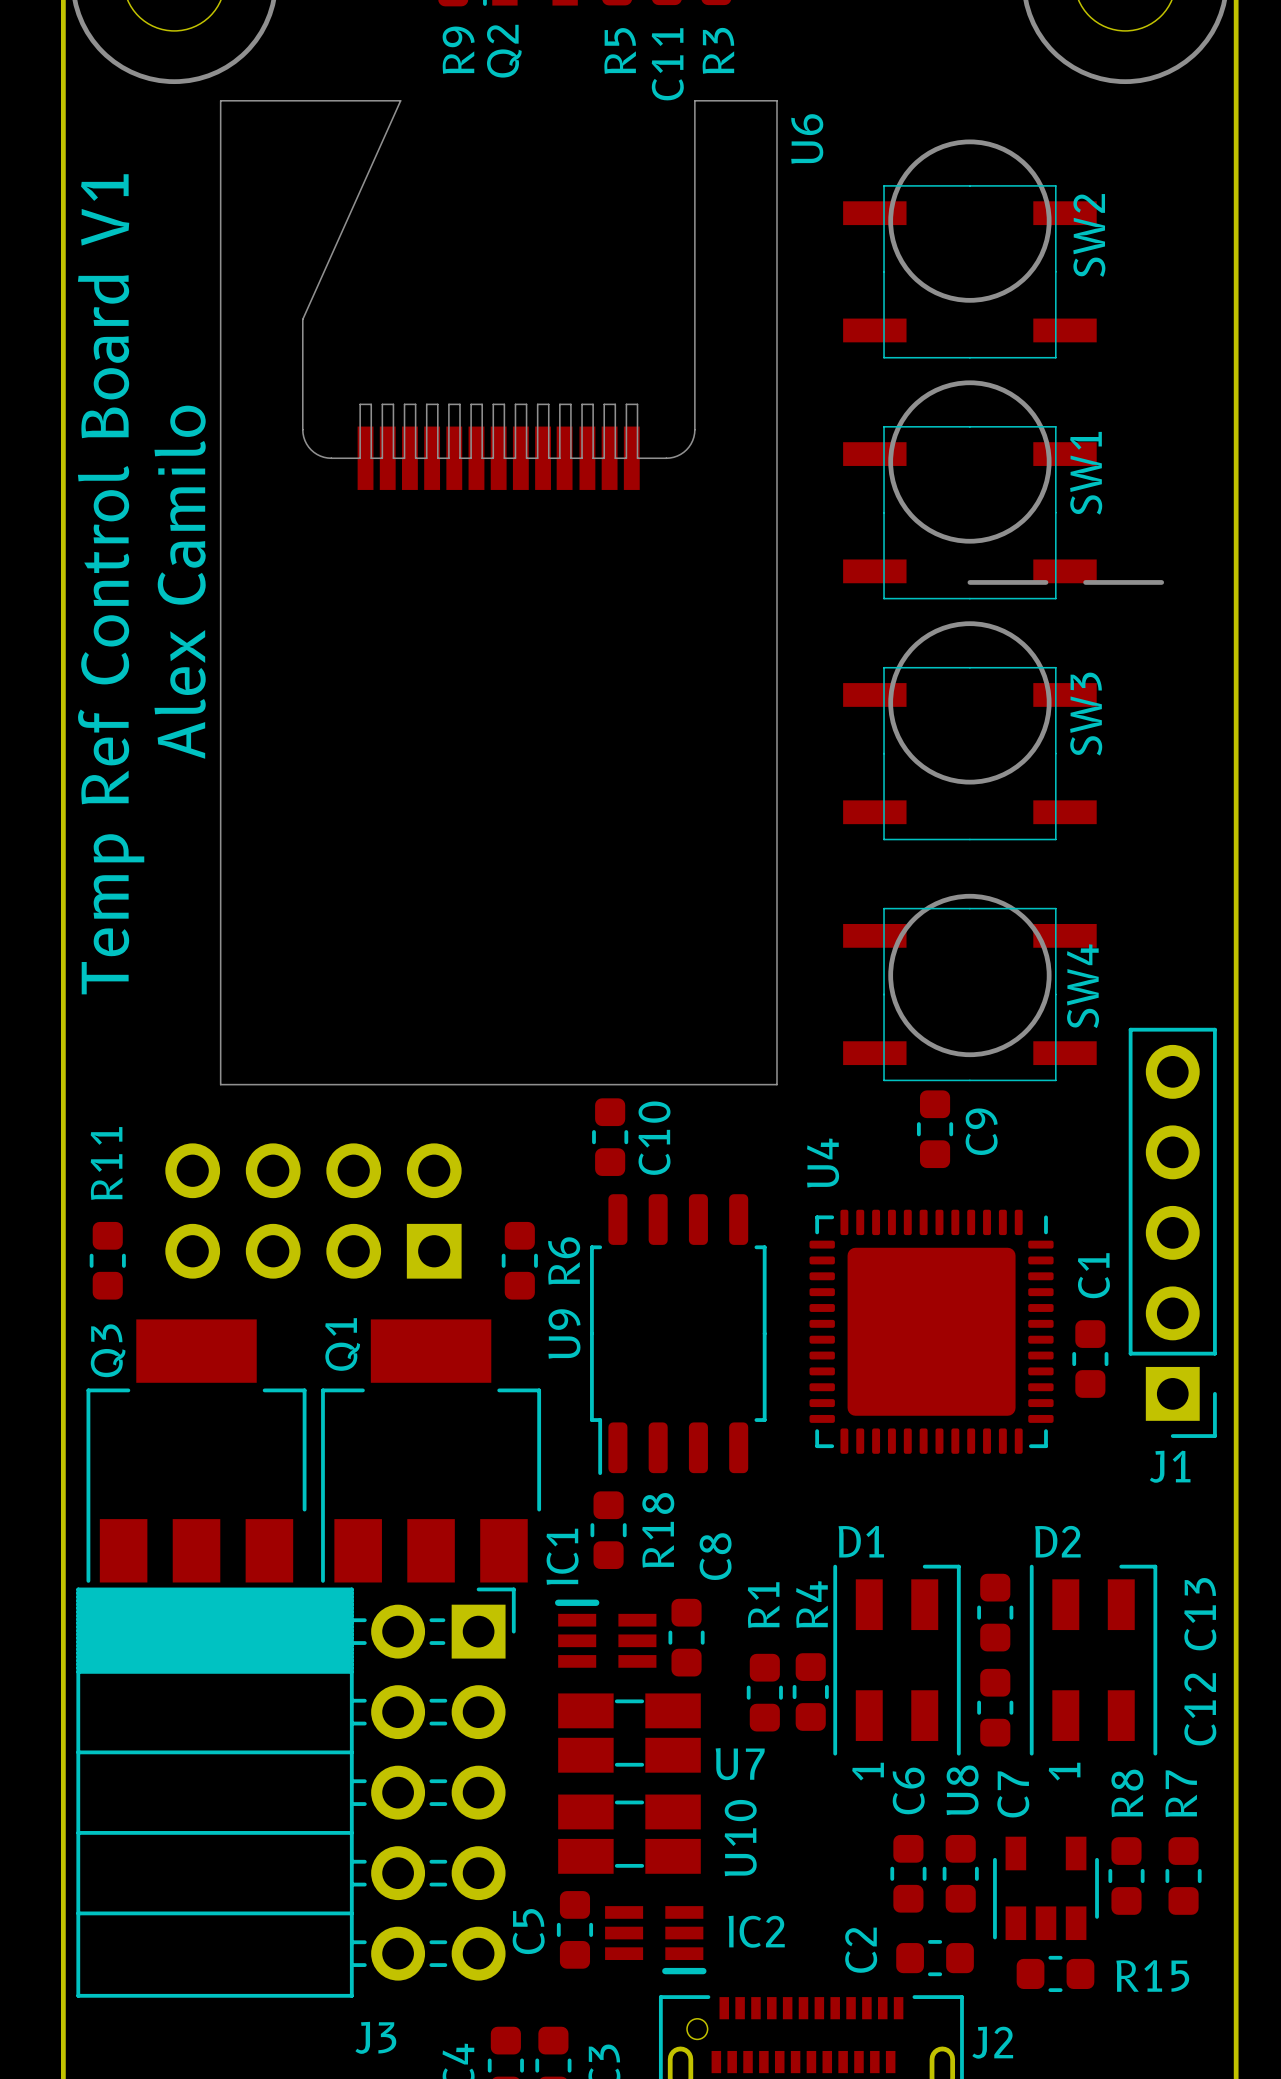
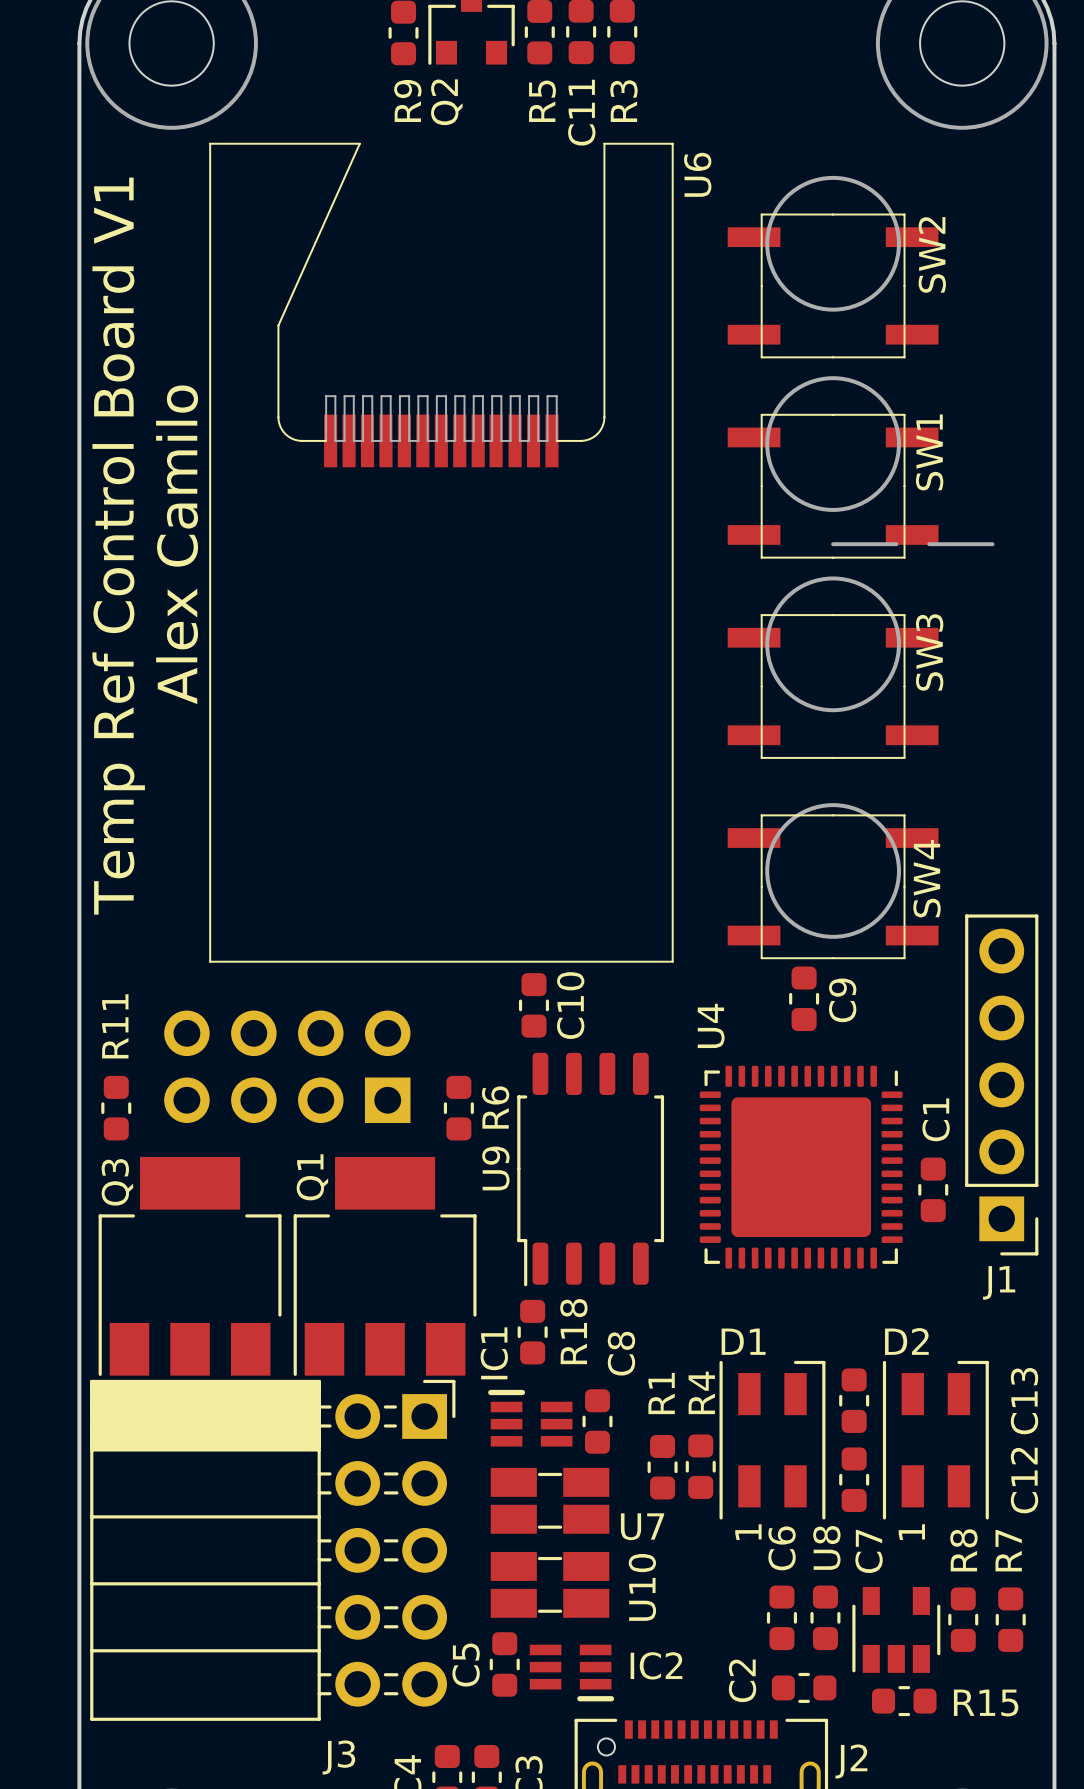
U6 footprint: [219, 100, 778, 1086] -> [209, 143, 674, 963]

